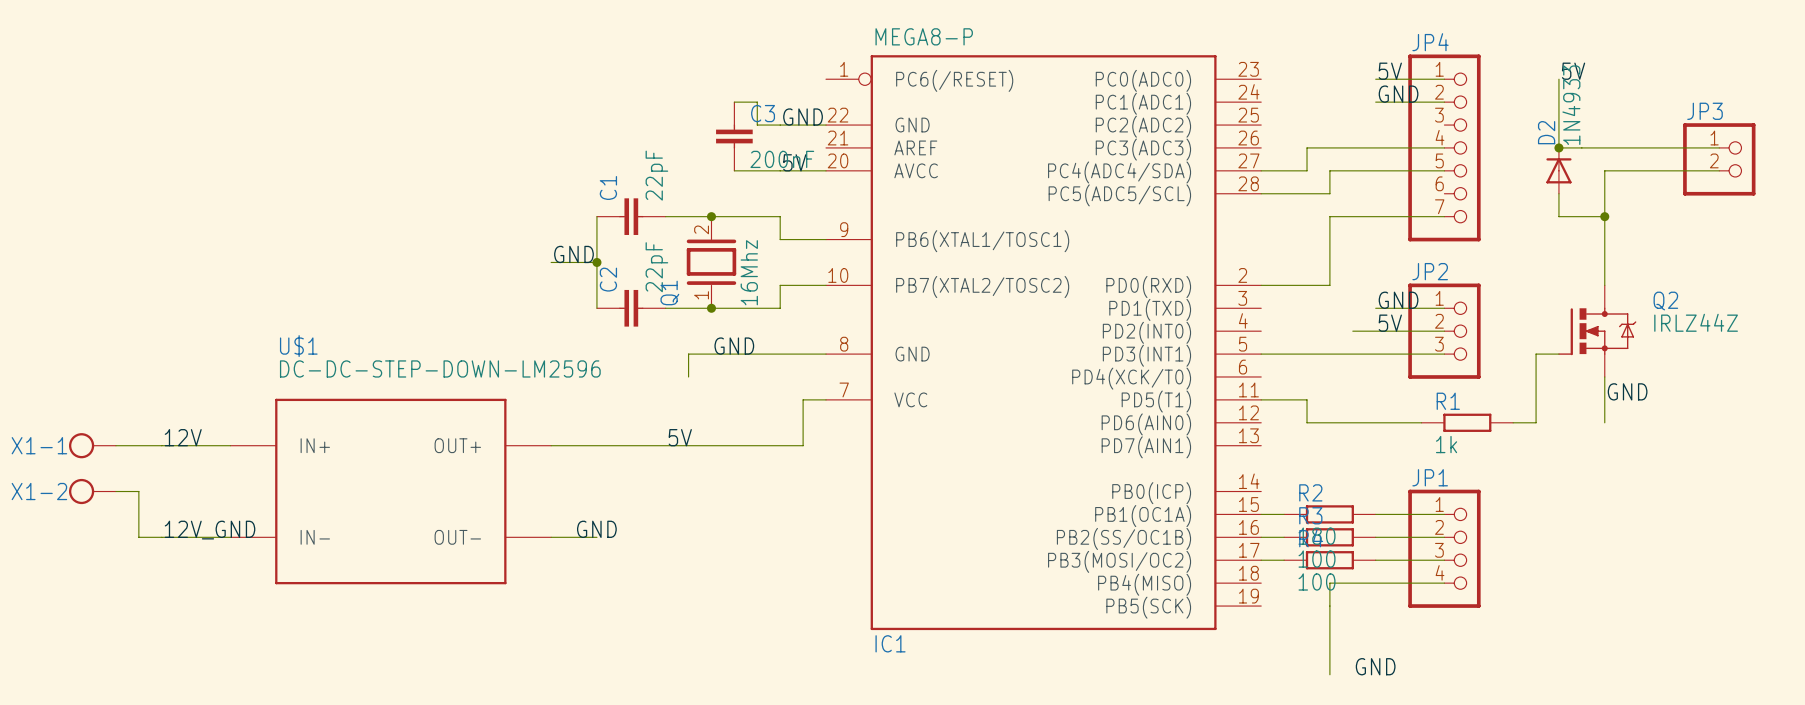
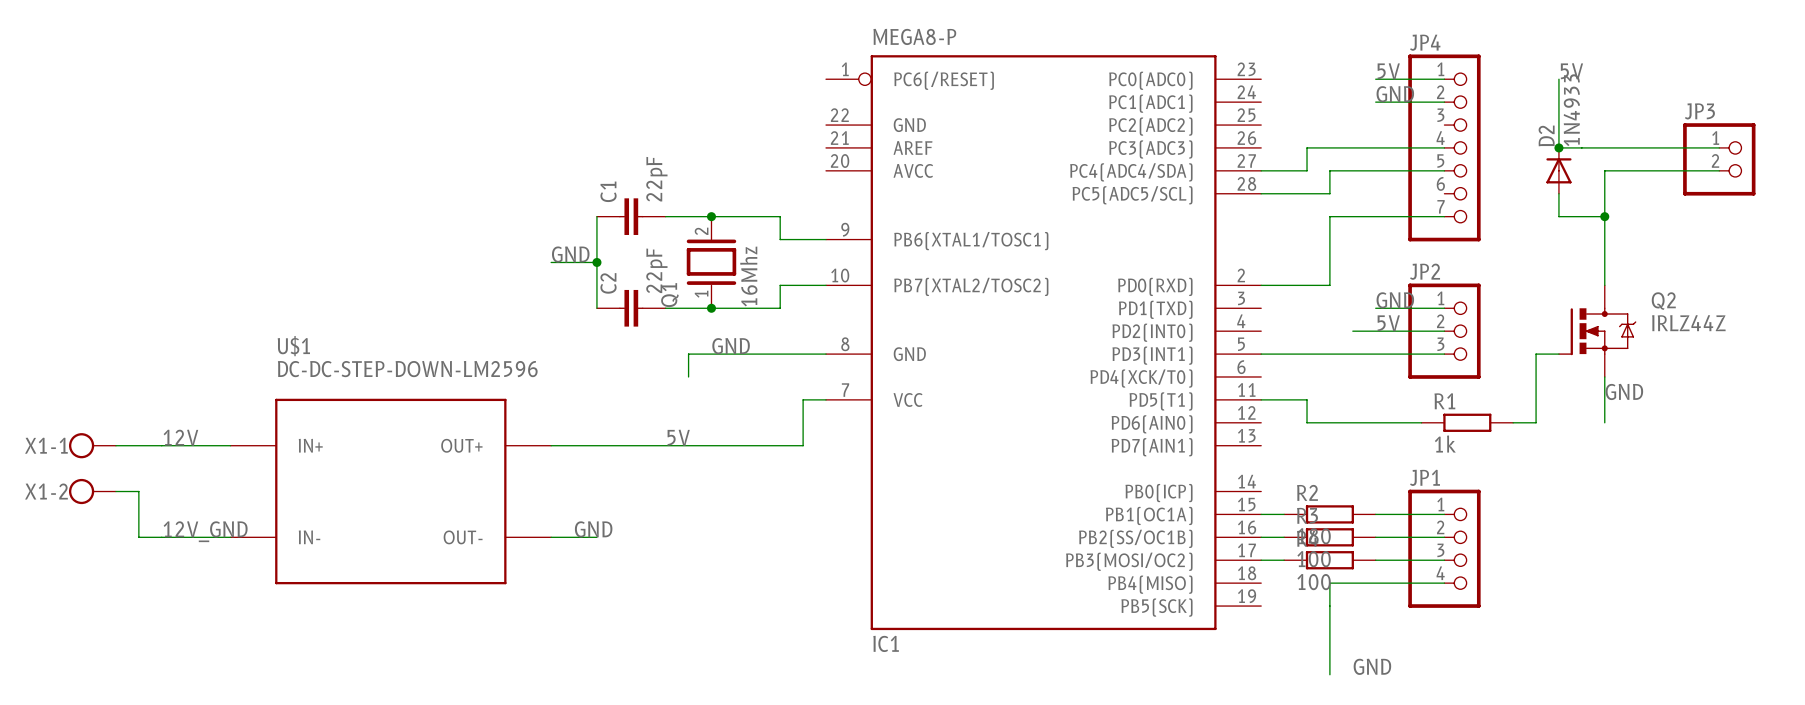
wire: (734, 102) (757, 102) (757, 125) (826, 125) -> none
label: GND (803, 117) -> none
C3: 200nF (734, 136) -> none
label: 5V (794, 162) -> none
wire: (734, 170) (826, 170) -> none

